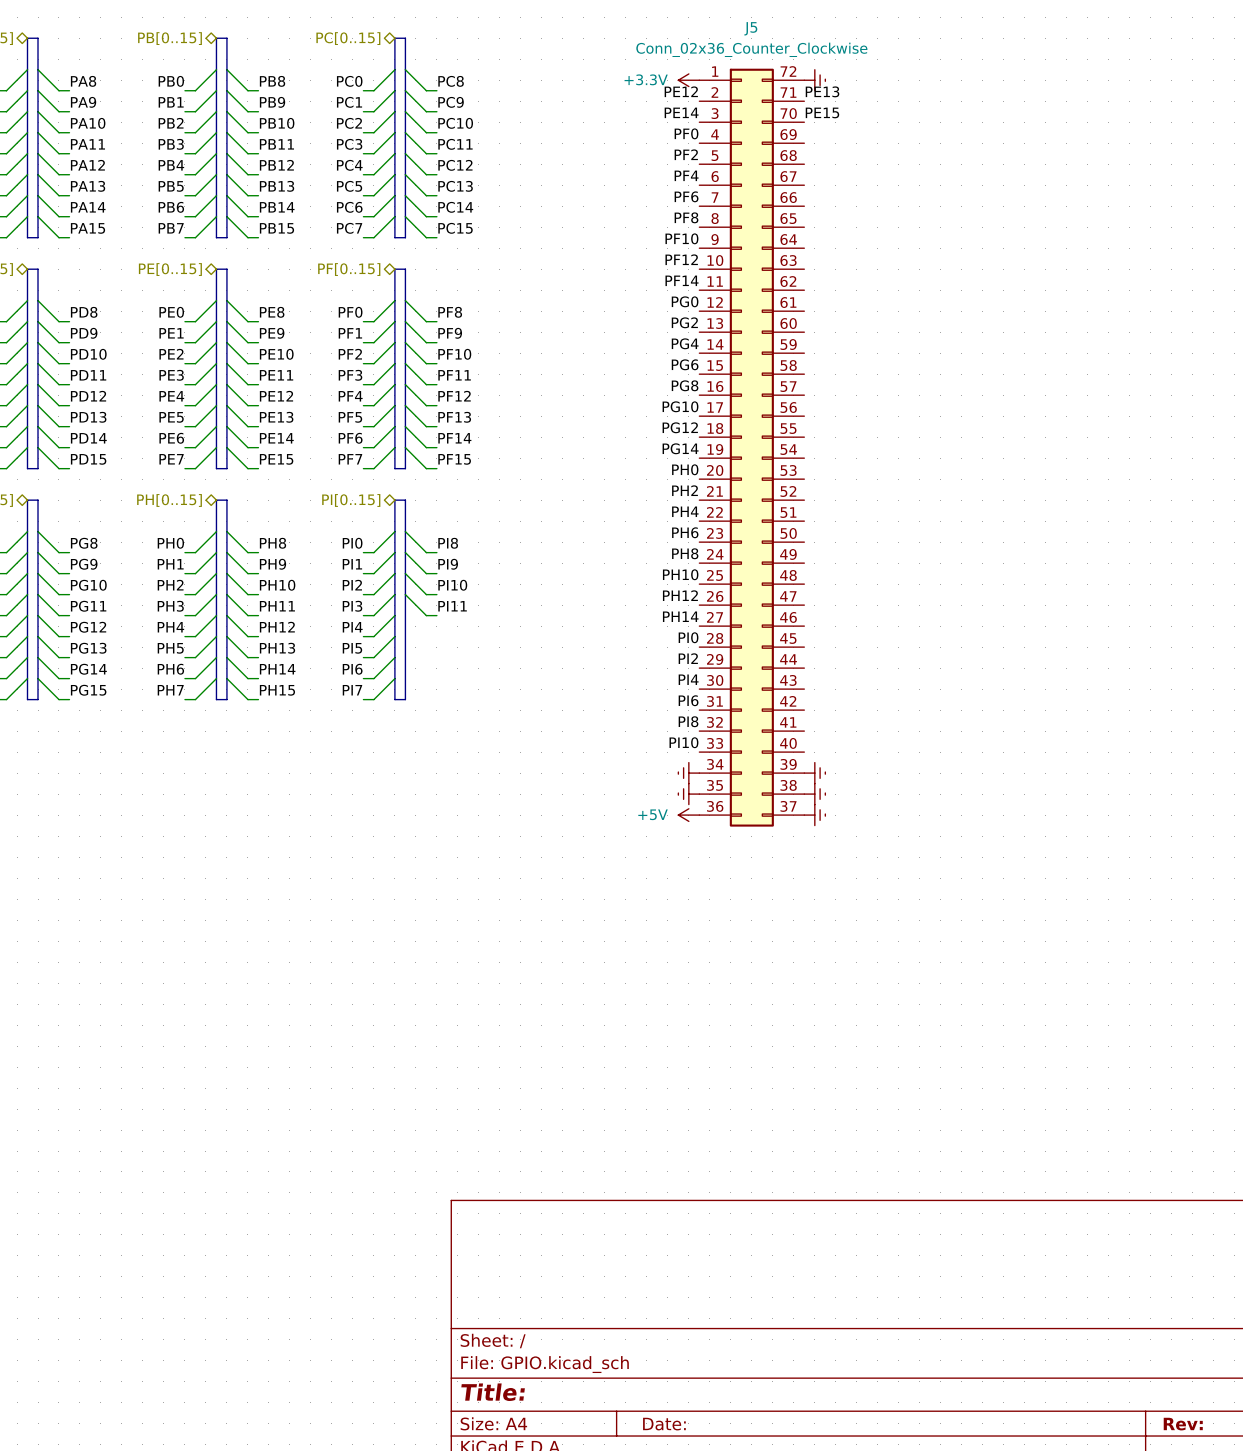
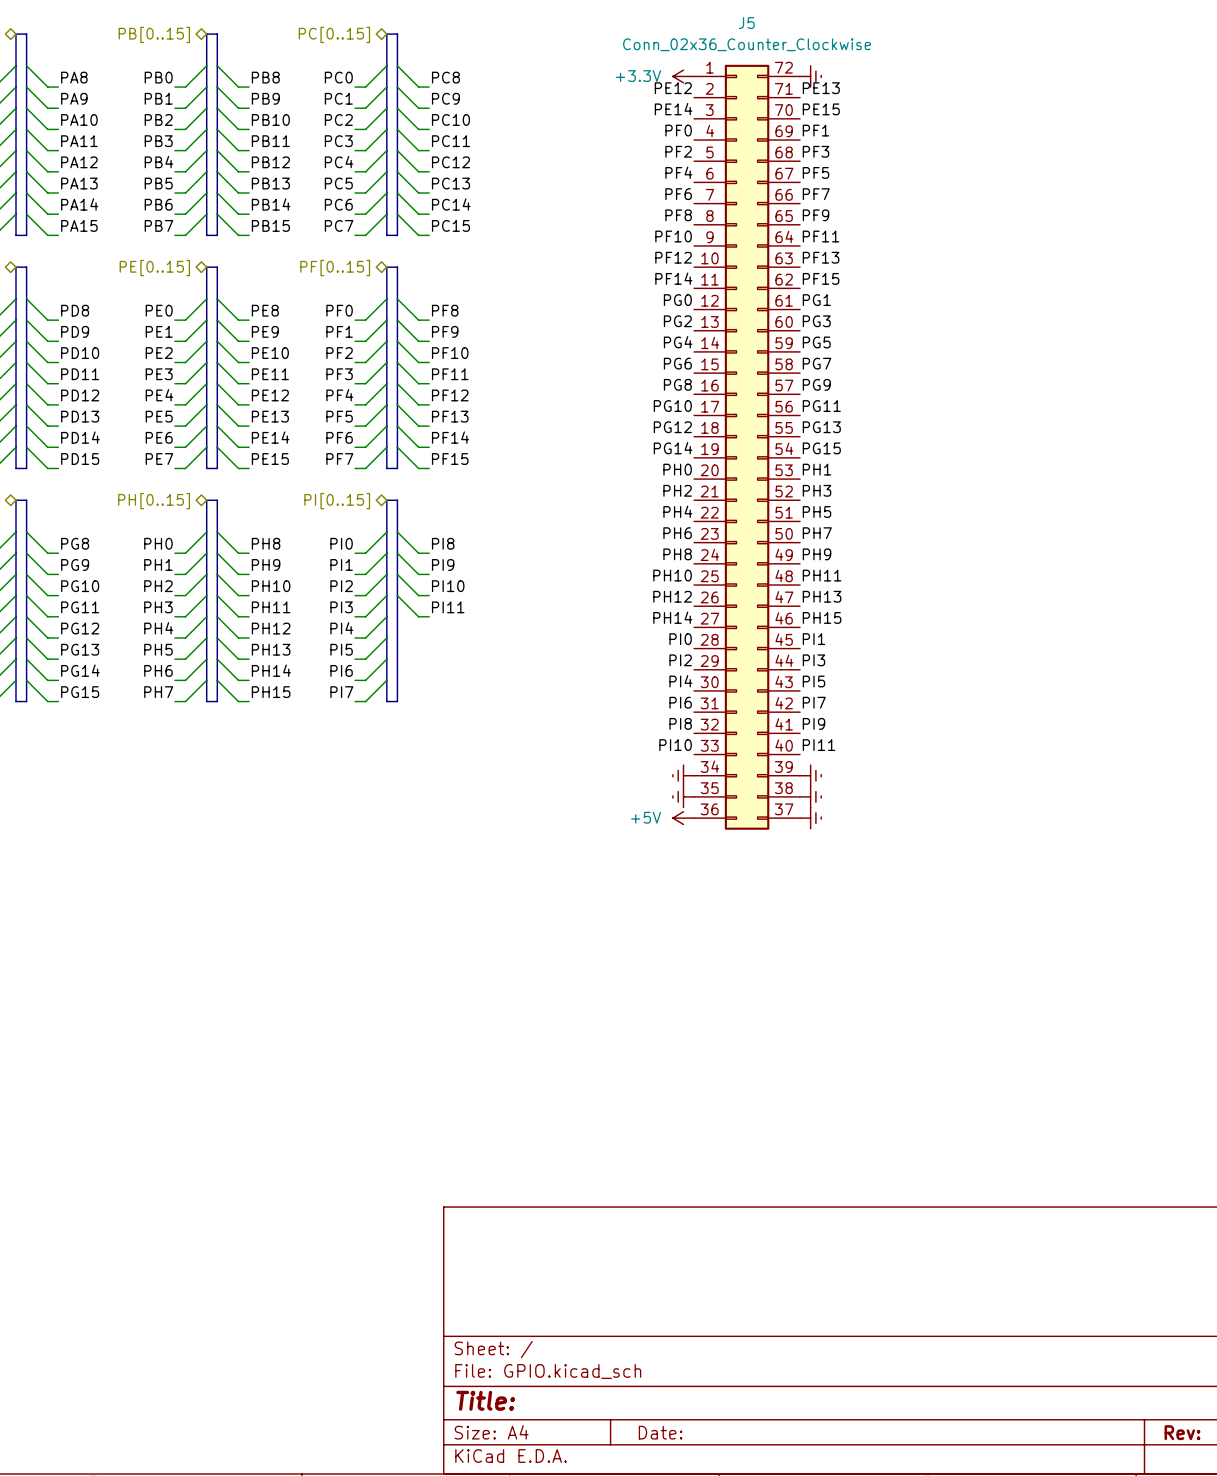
label: none -> PF1 (816, 130)
label: none -> PF3 (816, 151)
label: none -> PF5 (816, 172)
label: none -> PF7 (816, 194)
label: none -> PF9 (816, 215)
label: none -> PF11 (821, 236)
label: none -> PF13 (821, 257)
label: none -> PF15 (821, 278)
label: none -> PG1 (816, 300)
label: none -> PG3 (816, 321)
label: none -> PG5 (816, 342)
label: none -> PG7 (817, 363)
label: none -> PG9 (816, 384)
label: none -> PG11 (821, 406)
label: none -> PG13 (821, 427)
label: none -> PG15 (821, 448)
label: none -> PH1 (817, 469)
label: none -> PH3 (817, 490)
label: none -> PH5 (817, 511)
label: none -> PH7 (817, 533)
label: none -> PH9 (817, 554)
label: none -> PH11 (822, 575)
label: none -> PH13 (822, 596)
label: none -> PH15 (822, 617)
label: none -> PI1 (813, 639)
label: none -> PI3 (813, 660)
label: none -> PI5 (813, 681)
label: none -> PI7 (814, 702)
label: none -> PI9 (813, 723)
label: none -> PI11 (819, 745)

